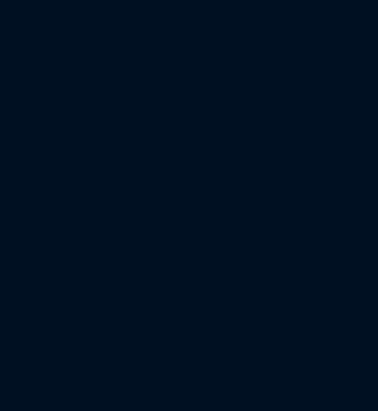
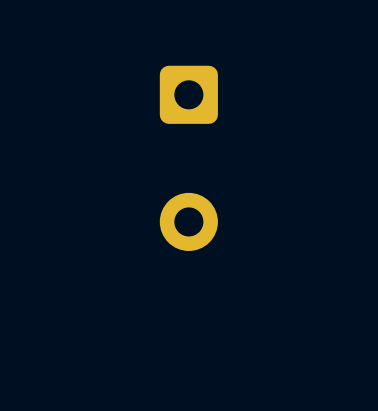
part: none -> (188, 158)

